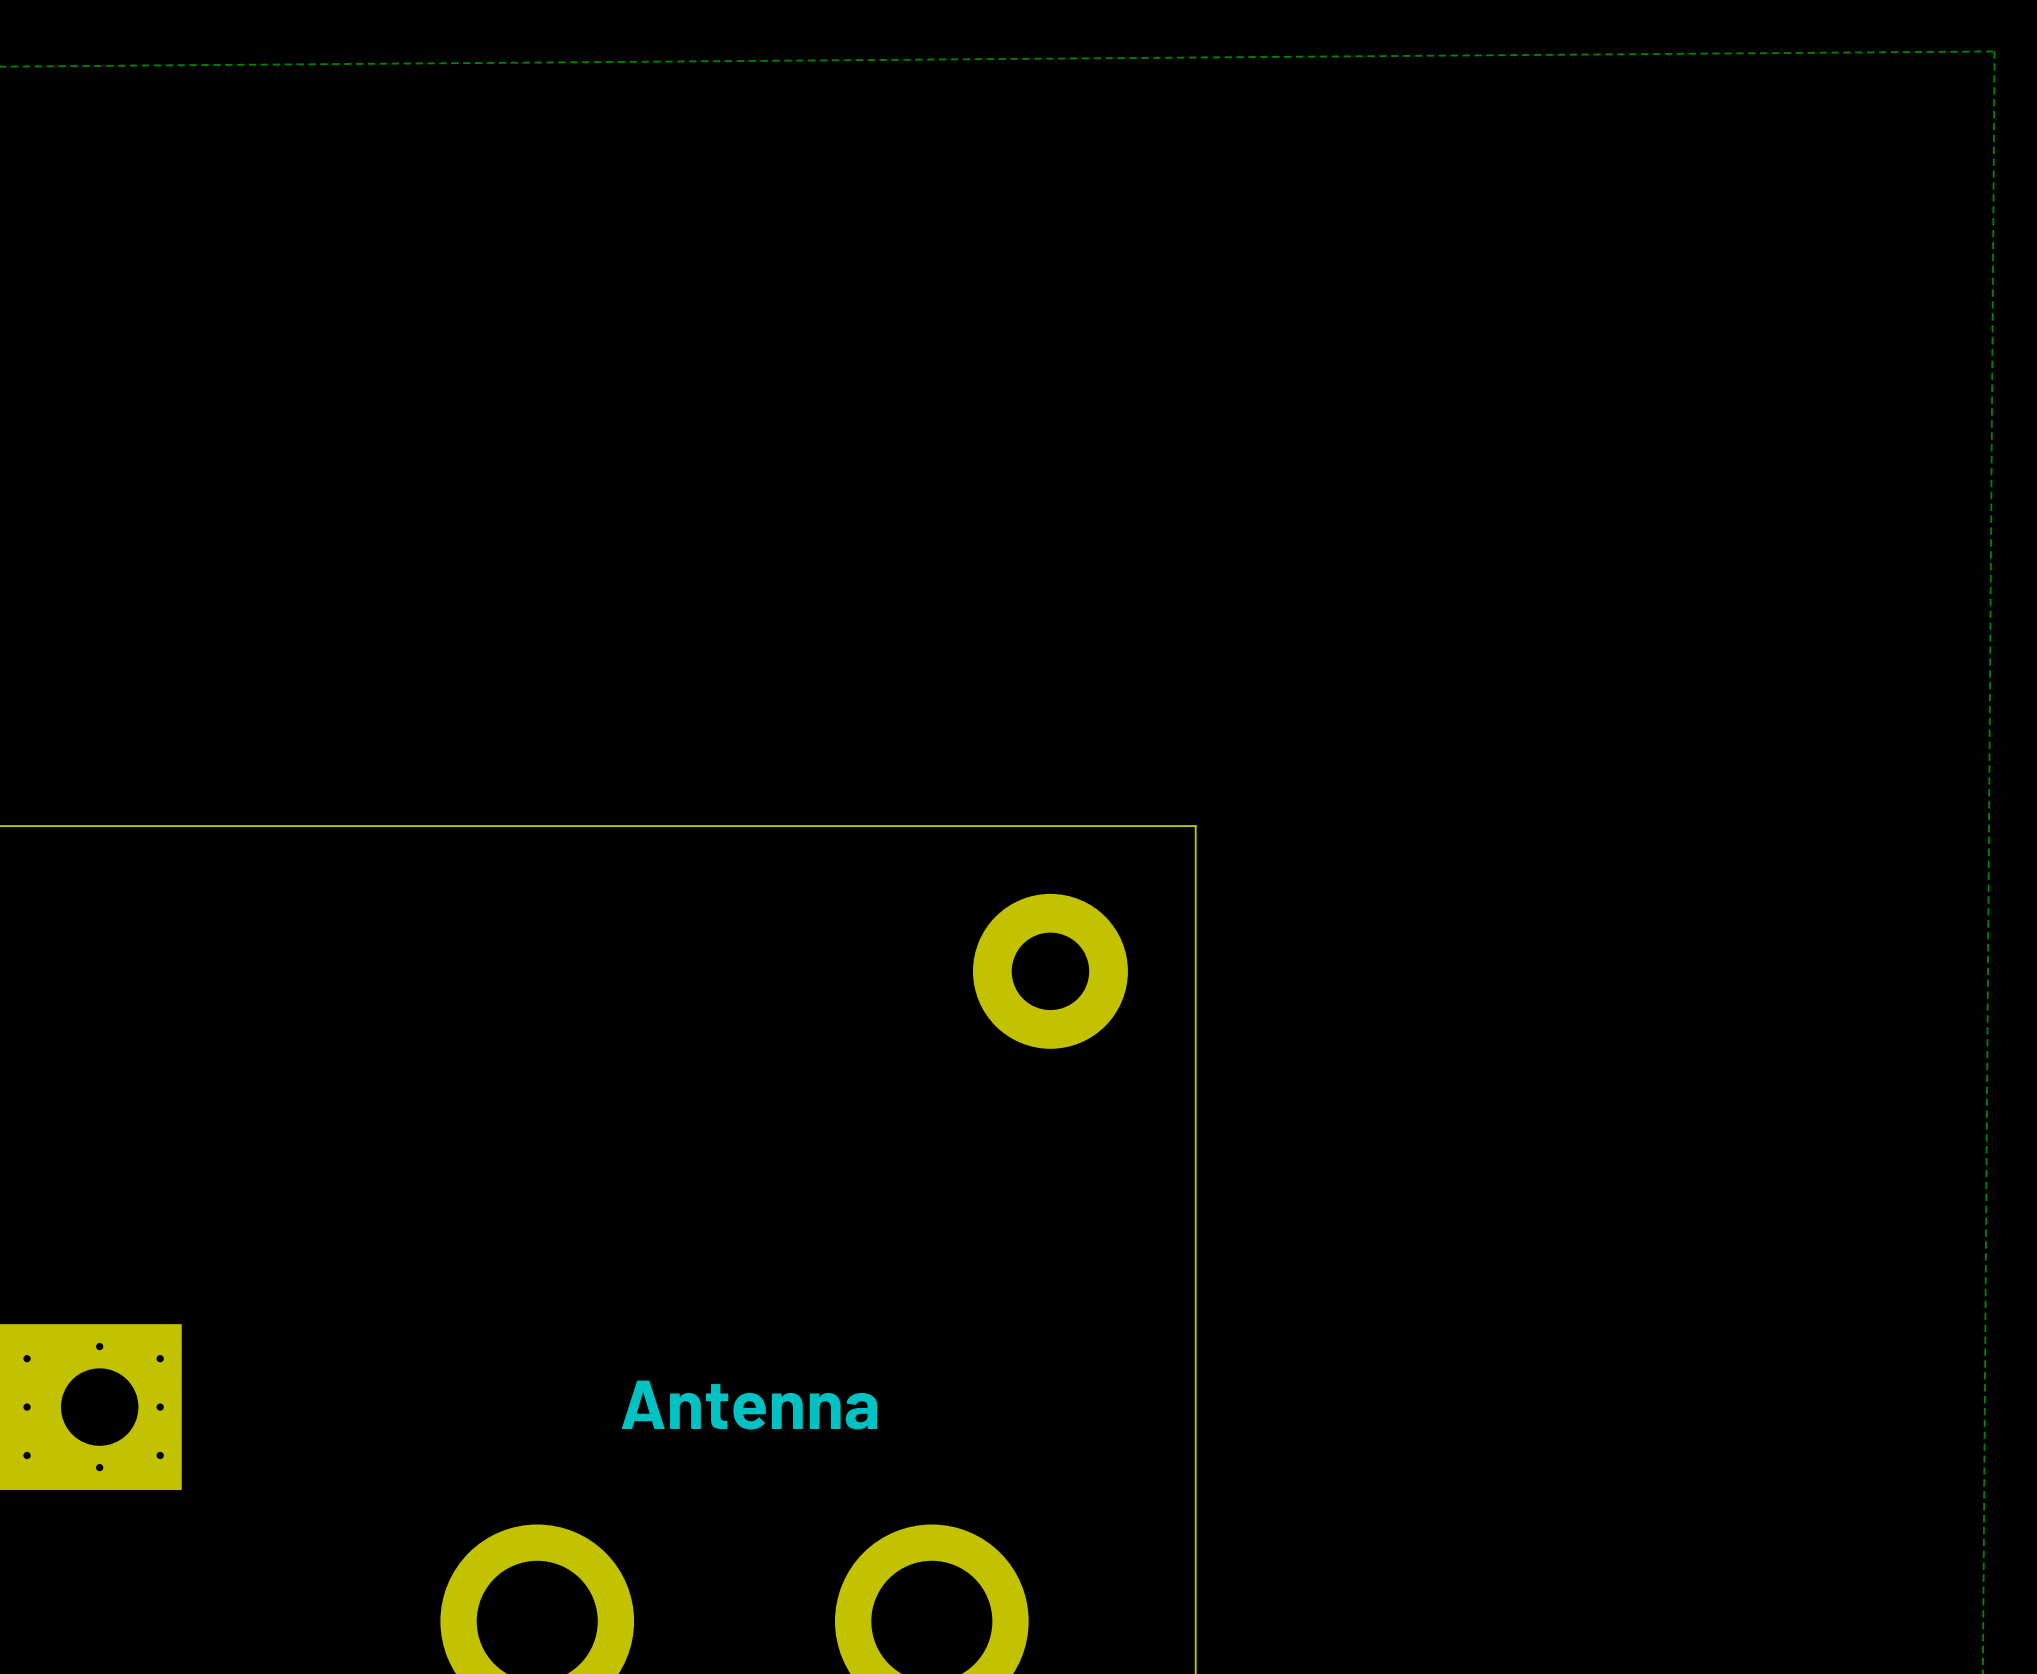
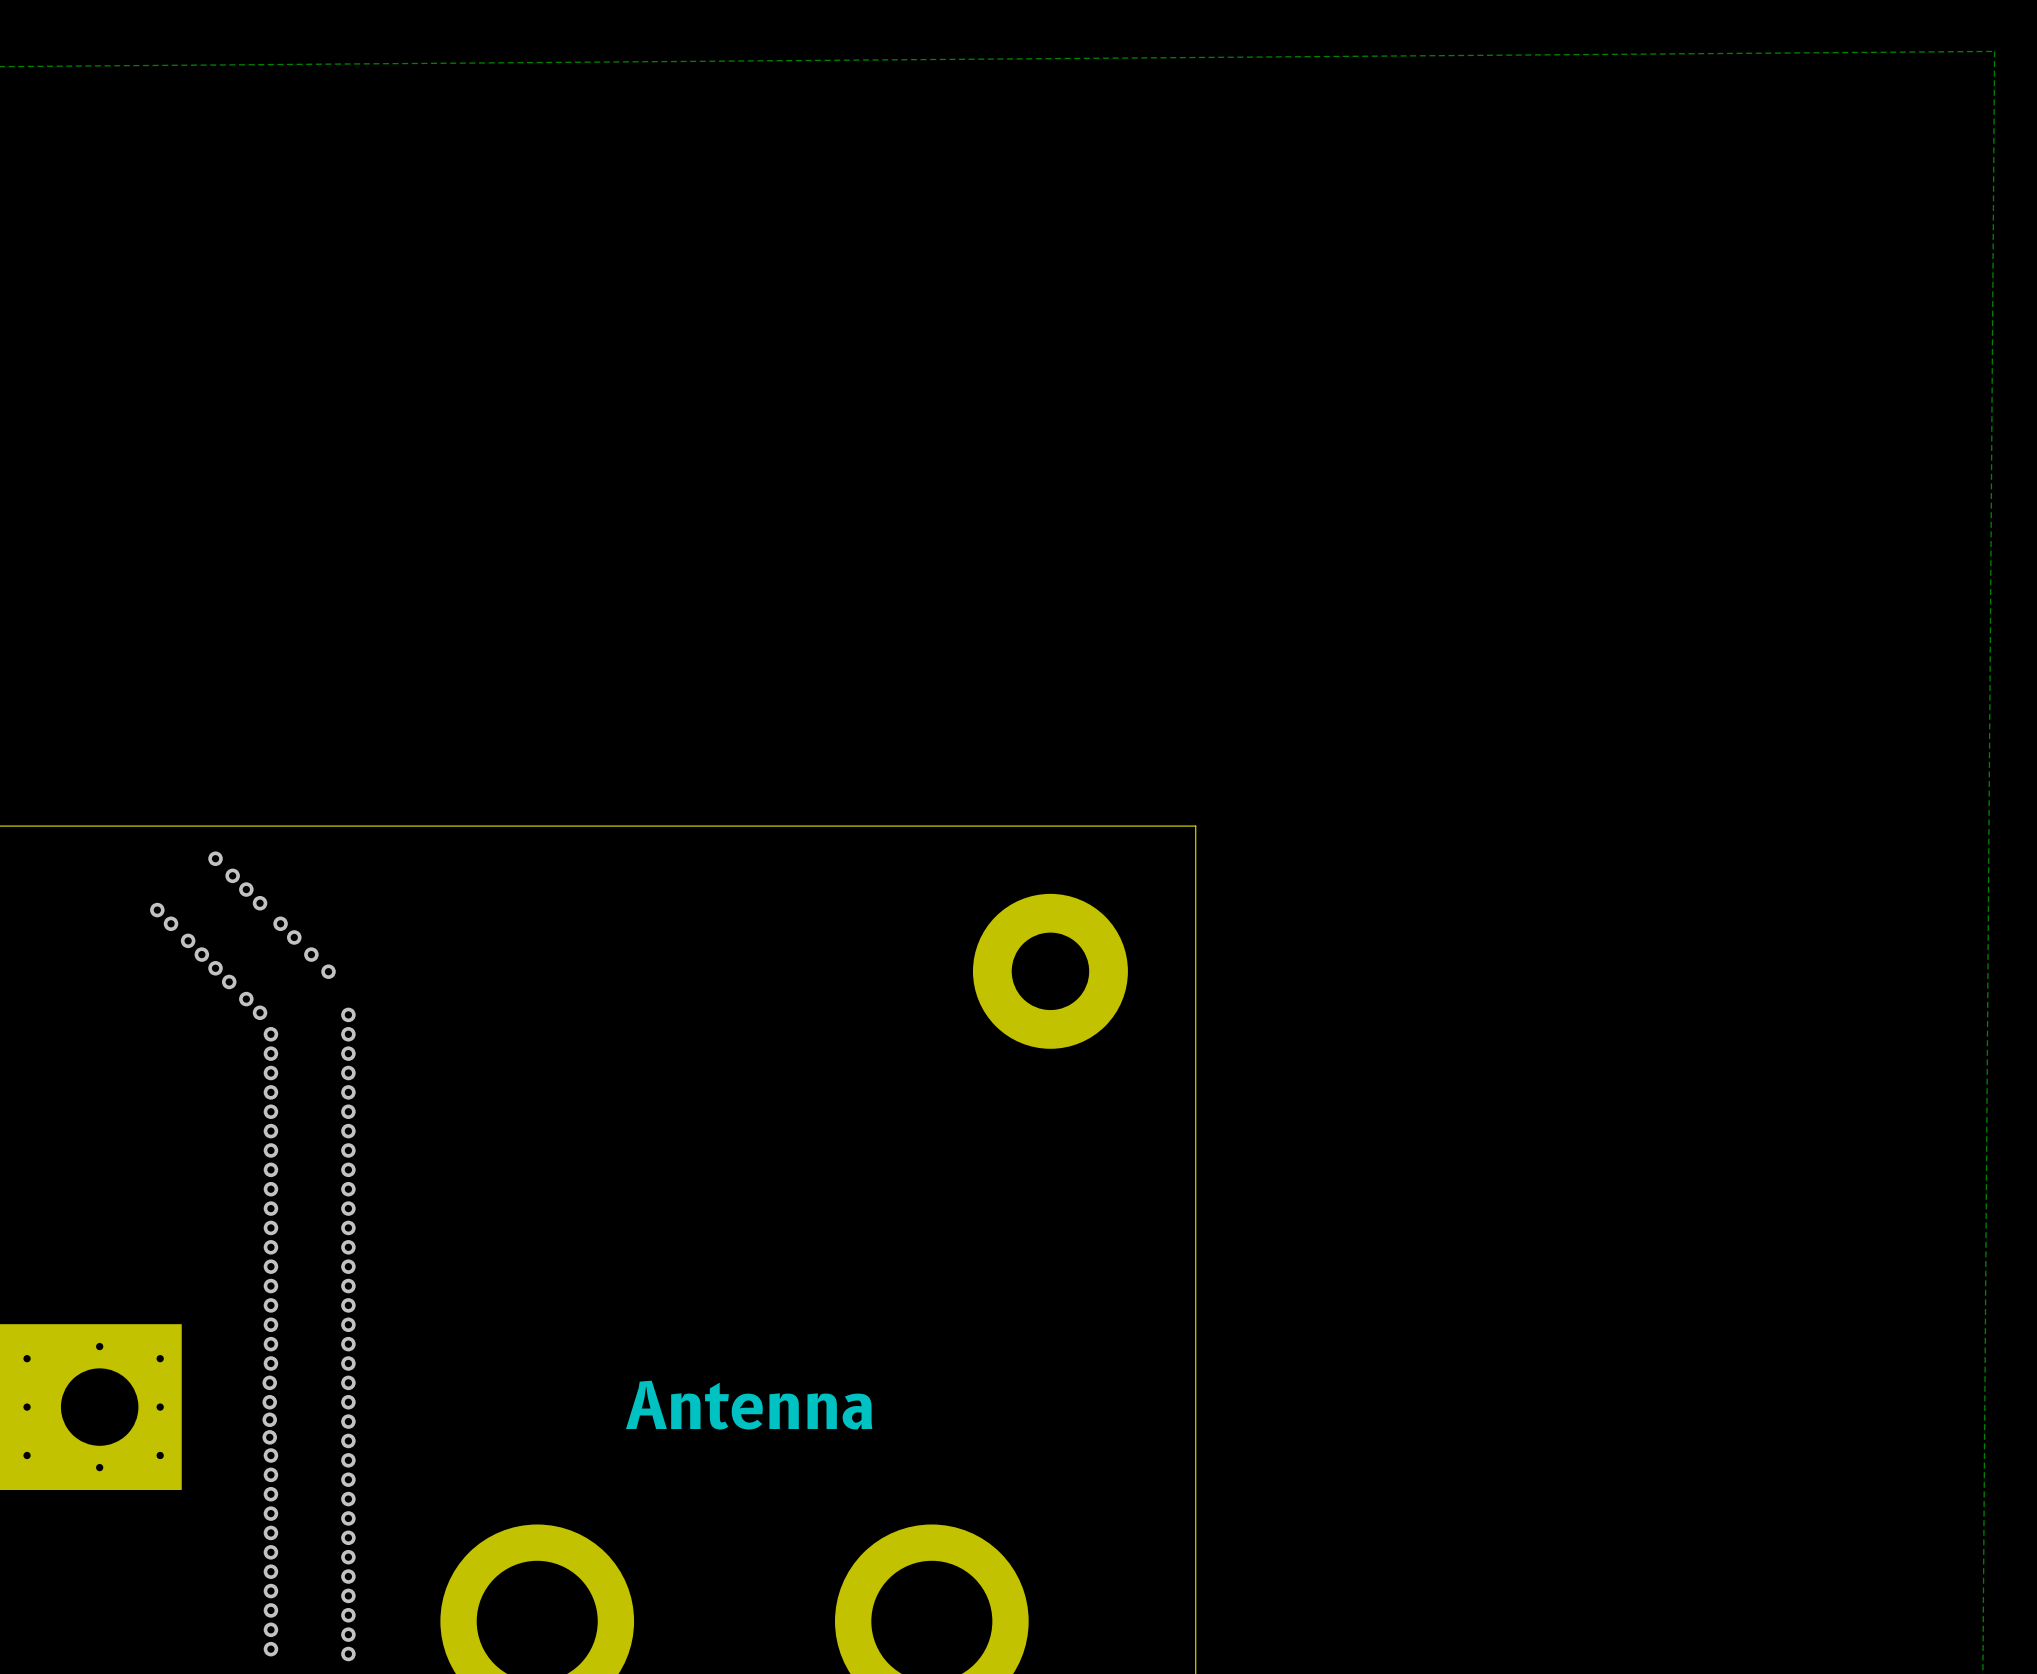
via: none -> (215, 858)
via: none -> (232, 875)
via: none -> (246, 889)
via: none -> (260, 903)
via: none -> (157, 910)
via: none -> (171, 923)
via: none -> (280, 923)
via: none -> (294, 937)
via: none -> (188, 940)
via: none -> (201, 954)
via: none -> (311, 954)
via: none -> (215, 968)
via: none -> (328, 971)
via: none -> (229, 981)
via: none -> (246, 999)
via: none -> (260, 1012)
via: none -> (348, 1014)
via: none -> (270, 1034)
via: none -> (348, 1034)
via: none -> (270, 1053)
via: none -> (348, 1053)
via: none -> (270, 1073)
via: none -> (348, 1073)
via: none -> (270, 1092)
via: none -> (348, 1092)
via: none -> (270, 1111)
via: none -> (348, 1111)
via: none -> (270, 1131)
via: none -> (348, 1131)
via: none -> (270, 1150)
via: none -> (348, 1150)
via: none -> (270, 1169)
via: none -> (348, 1169)
via: none -> (270, 1189)
via: none -> (348, 1189)
via: none -> (270, 1208)
via: none -> (348, 1208)
via: none -> (270, 1227)
via: none -> (348, 1227)
via: none -> (270, 1247)
via: none -> (348, 1247)
via: none -> (270, 1266)
via: none -> (348, 1266)
via: none -> (270, 1286)
via: none -> (348, 1286)
via: none -> (270, 1305)
via: none -> (348, 1305)
via: none -> (270, 1324)
via: none -> (348, 1324)
via: none -> (270, 1344)
via: none -> (348, 1344)
via: none -> (270, 1363)
via: none -> (348, 1363)
via: none -> (269, 1382)
via: none -> (348, 1382)
via: none -> (269, 1402)
via: none -> (348, 1402)
via: none -> (269, 1419)
via: none -> (348, 1421)
via: none -> (269, 1437)
via: none -> (348, 1440)
via: none -> (270, 1455)
via: none -> (348, 1460)
via: none -> (270, 1474)
via: none -> (348, 1479)
via: none -> (270, 1494)
via: none -> (348, 1499)
via: none -> (270, 1513)
via: none -> (348, 1518)
via: none -> (270, 1532)
via: none -> (348, 1537)
via: none -> (270, 1552)
via: none -> (348, 1557)
via: none -> (270, 1571)
via: none -> (348, 1576)
via: none -> (270, 1591)
via: none -> (348, 1595)
via: none -> (270, 1610)
via: none -> (348, 1615)
via: none -> (270, 1629)
via: none -> (348, 1634)
via: none -> (270, 1649)
via: none -> (348, 1654)

